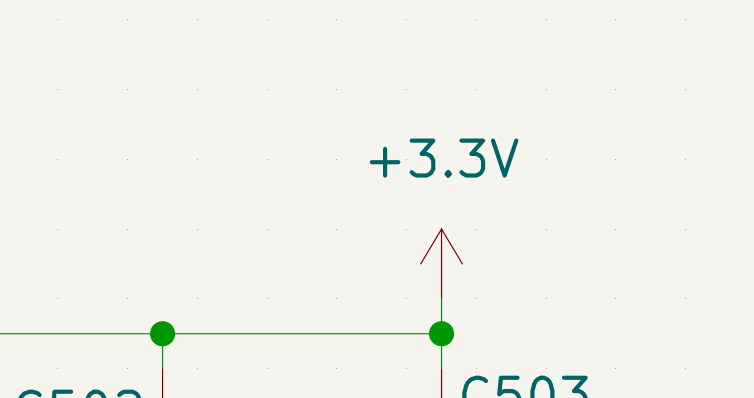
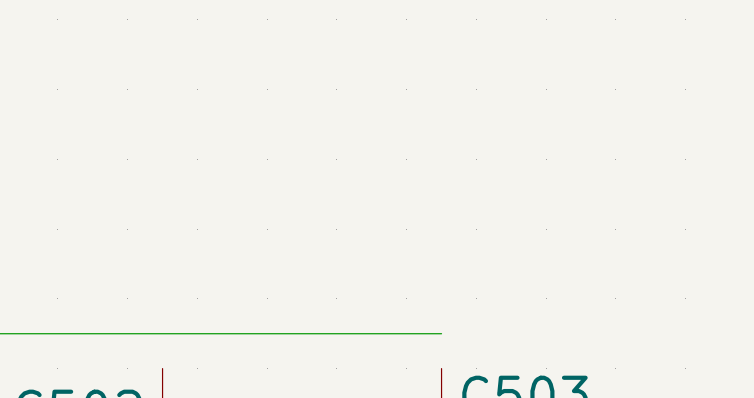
power symbol: +3.3V (441, 263) -> none
wire: (441, 298) (441, 368) -> none
wire: (162, 333) (162, 368) -> none
junction: (162, 333) -> none
junction: (441, 333) -> none

